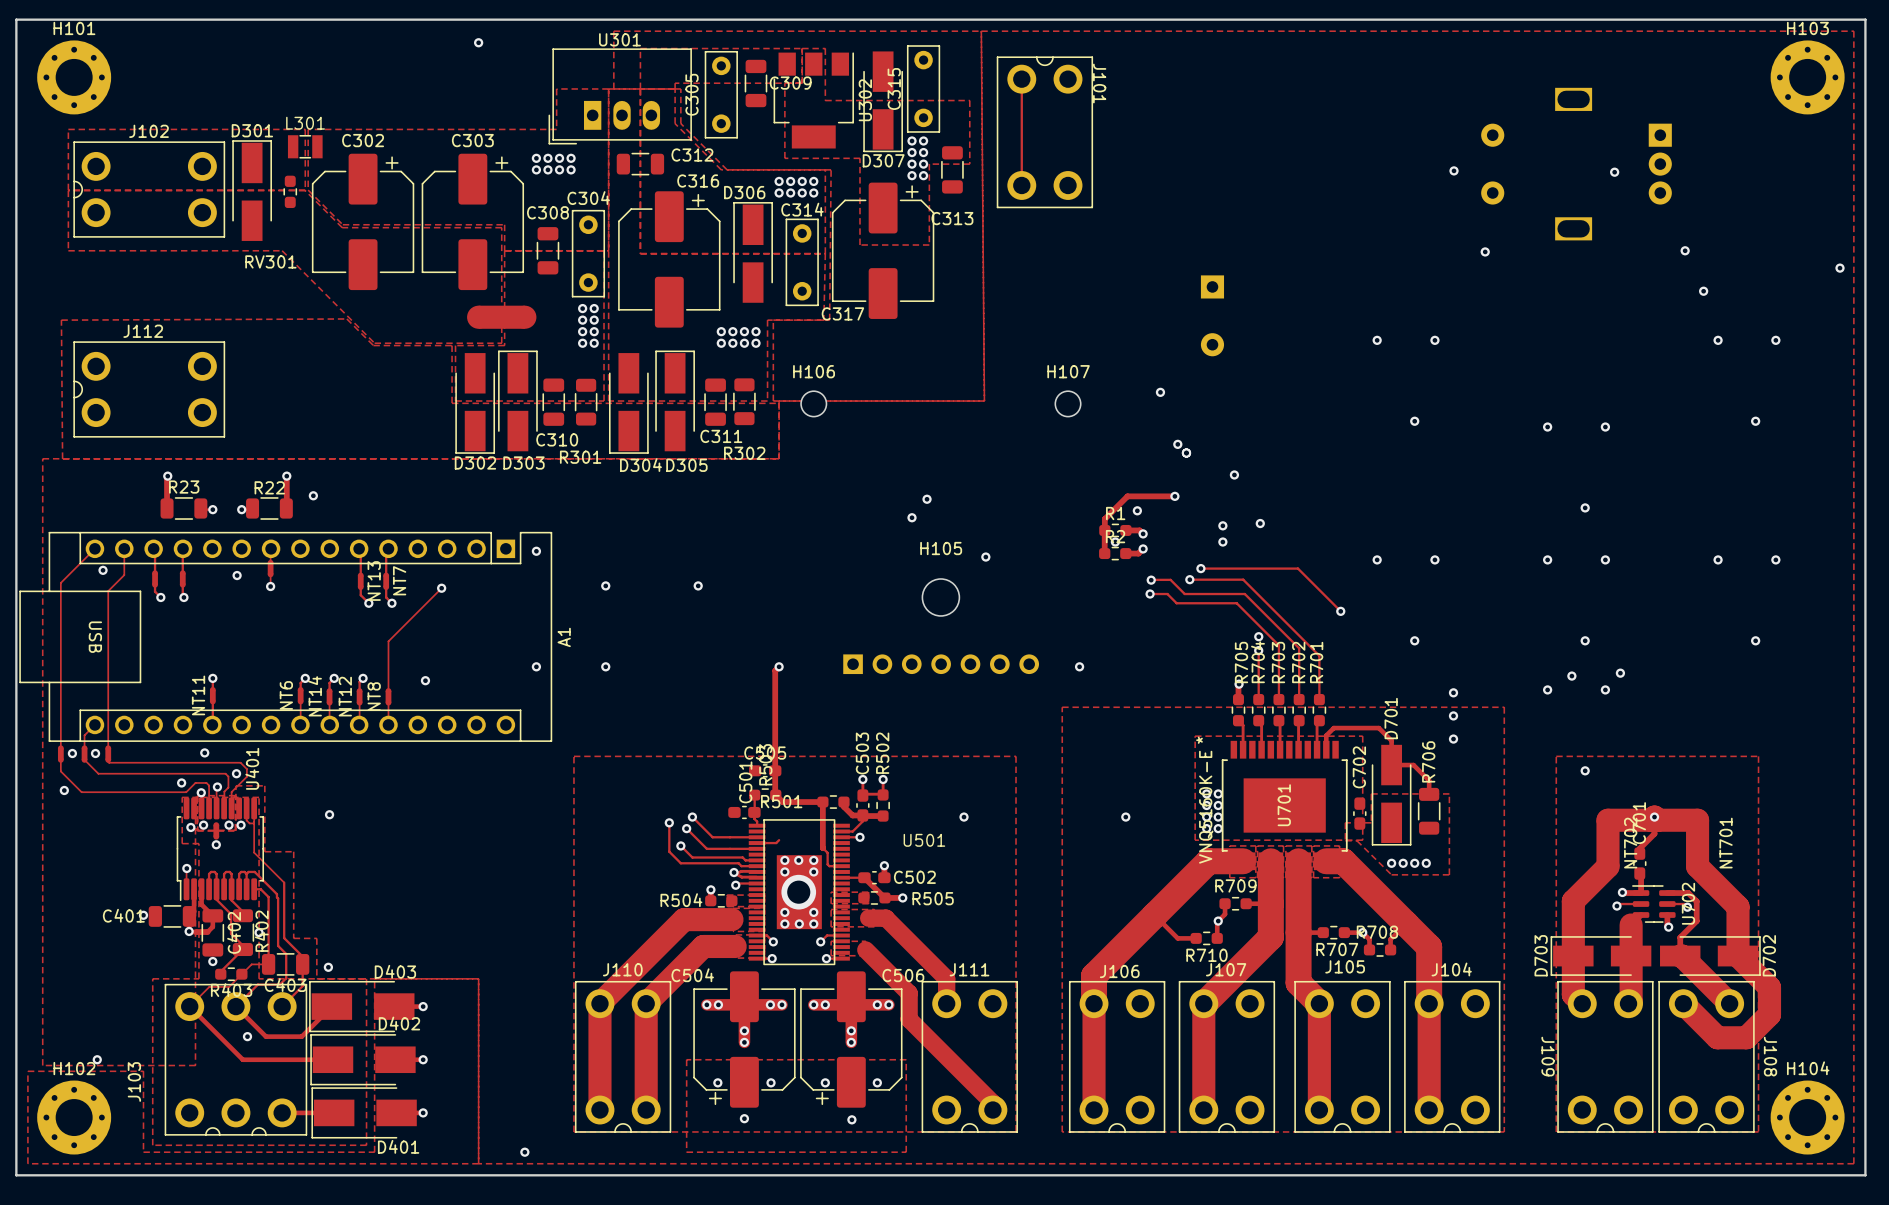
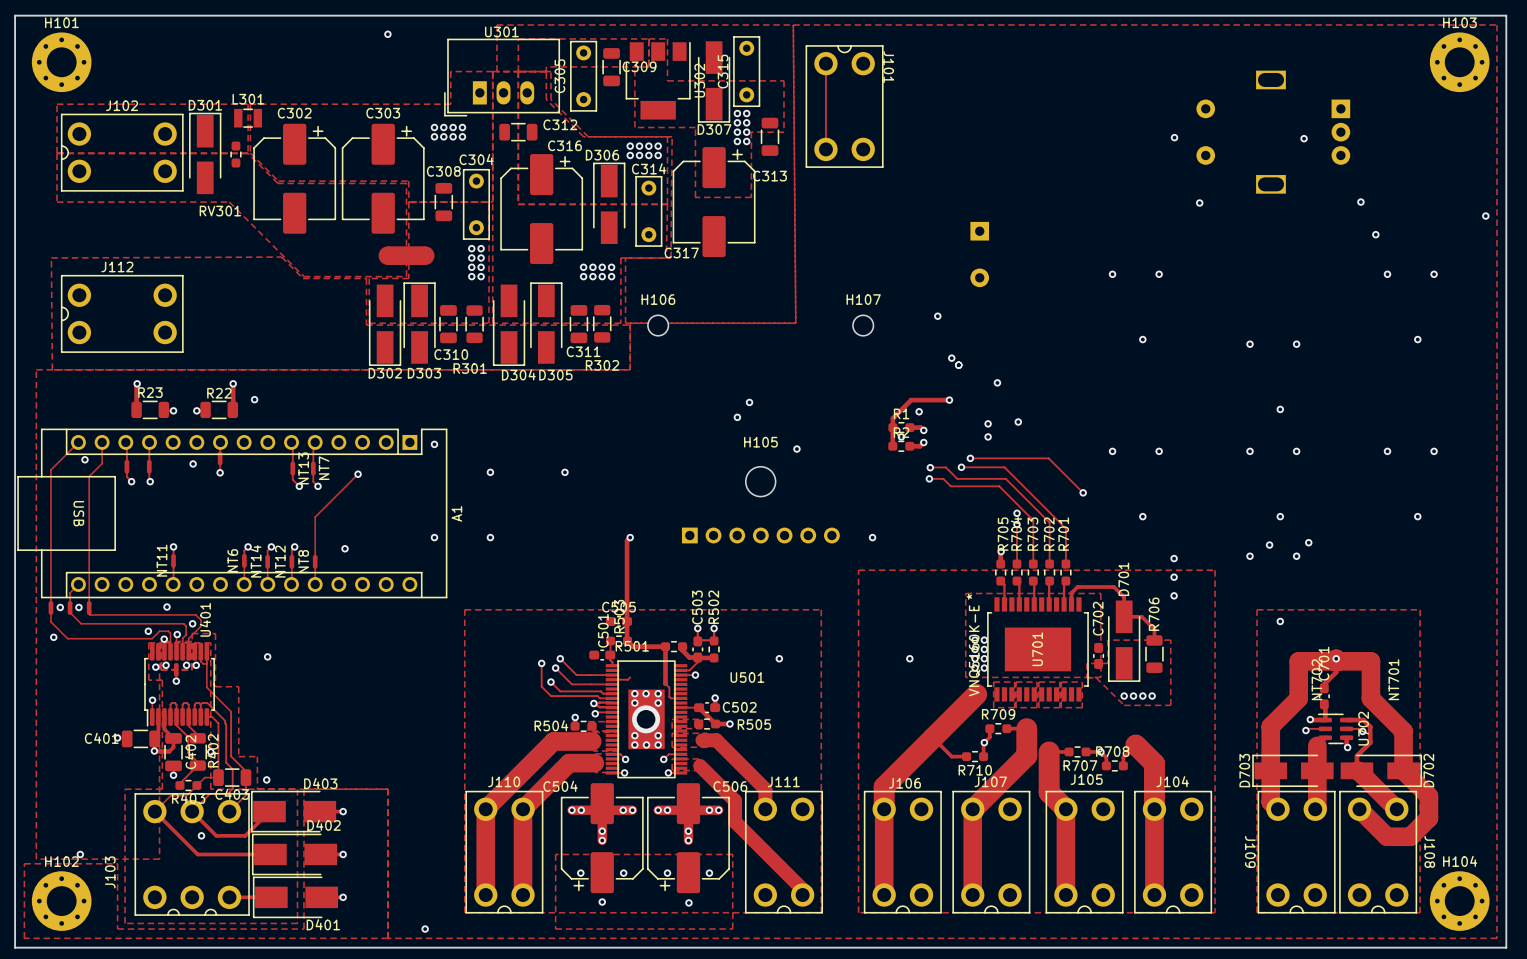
track: (1208, 861) (1243, 861) -> none
track: (1270, 861) (1270, 903) -> none
track: (1298, 861) (1298, 932) -> none
track: (1326, 861) (1343, 861) (1406, 923) -> none

